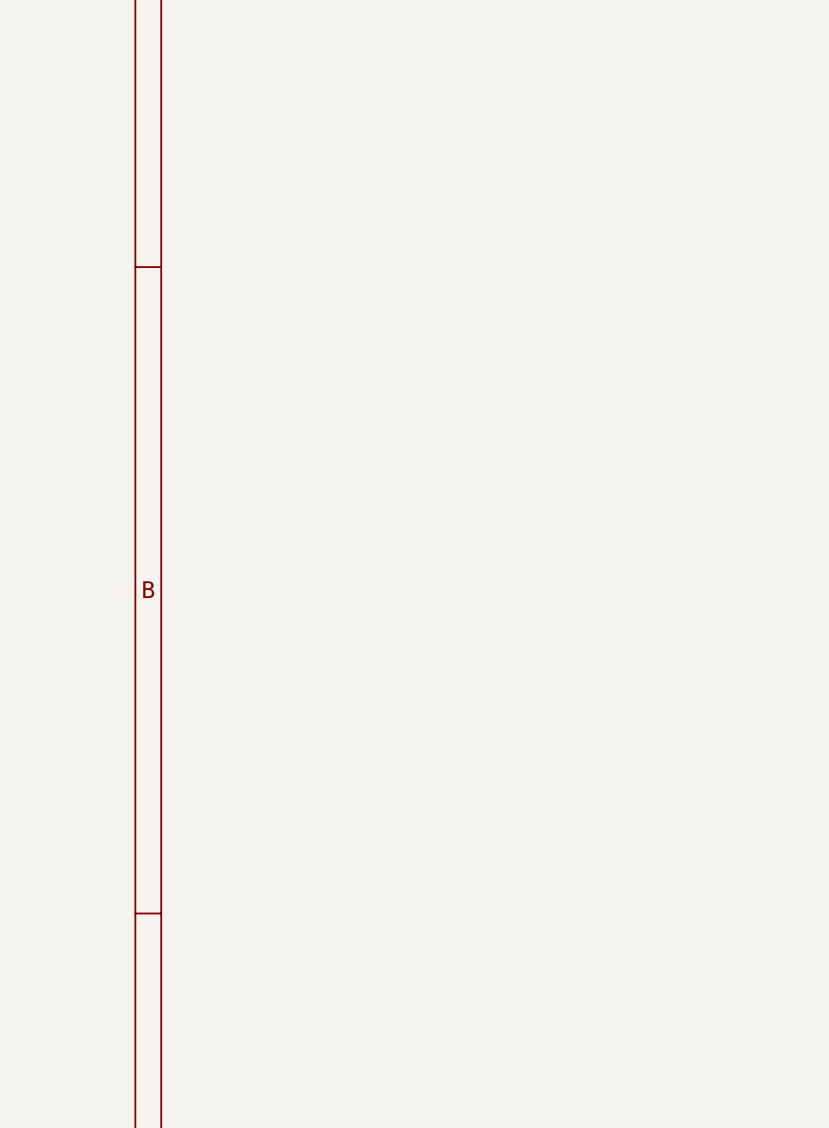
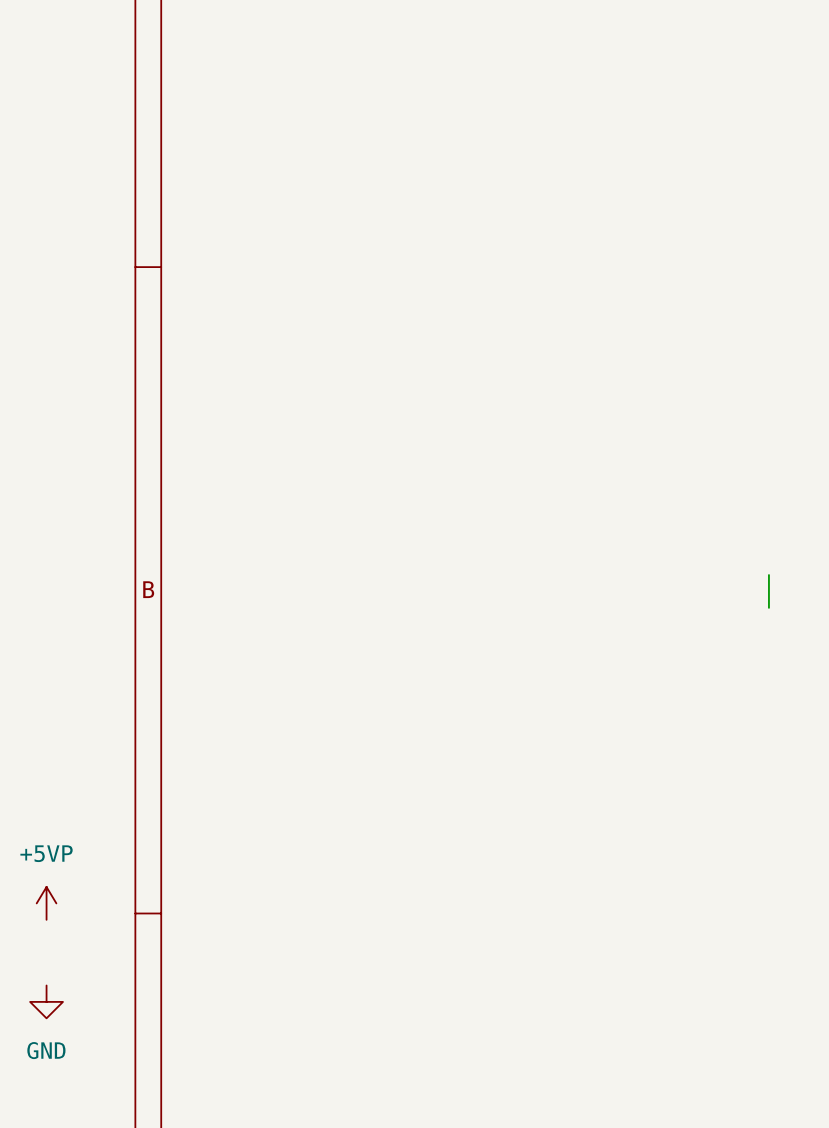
wire: none -> (768, 575) (768, 607)
power symbol: none -> +5VP (46, 903)
power symbol: none -> GND (46, 1001)

